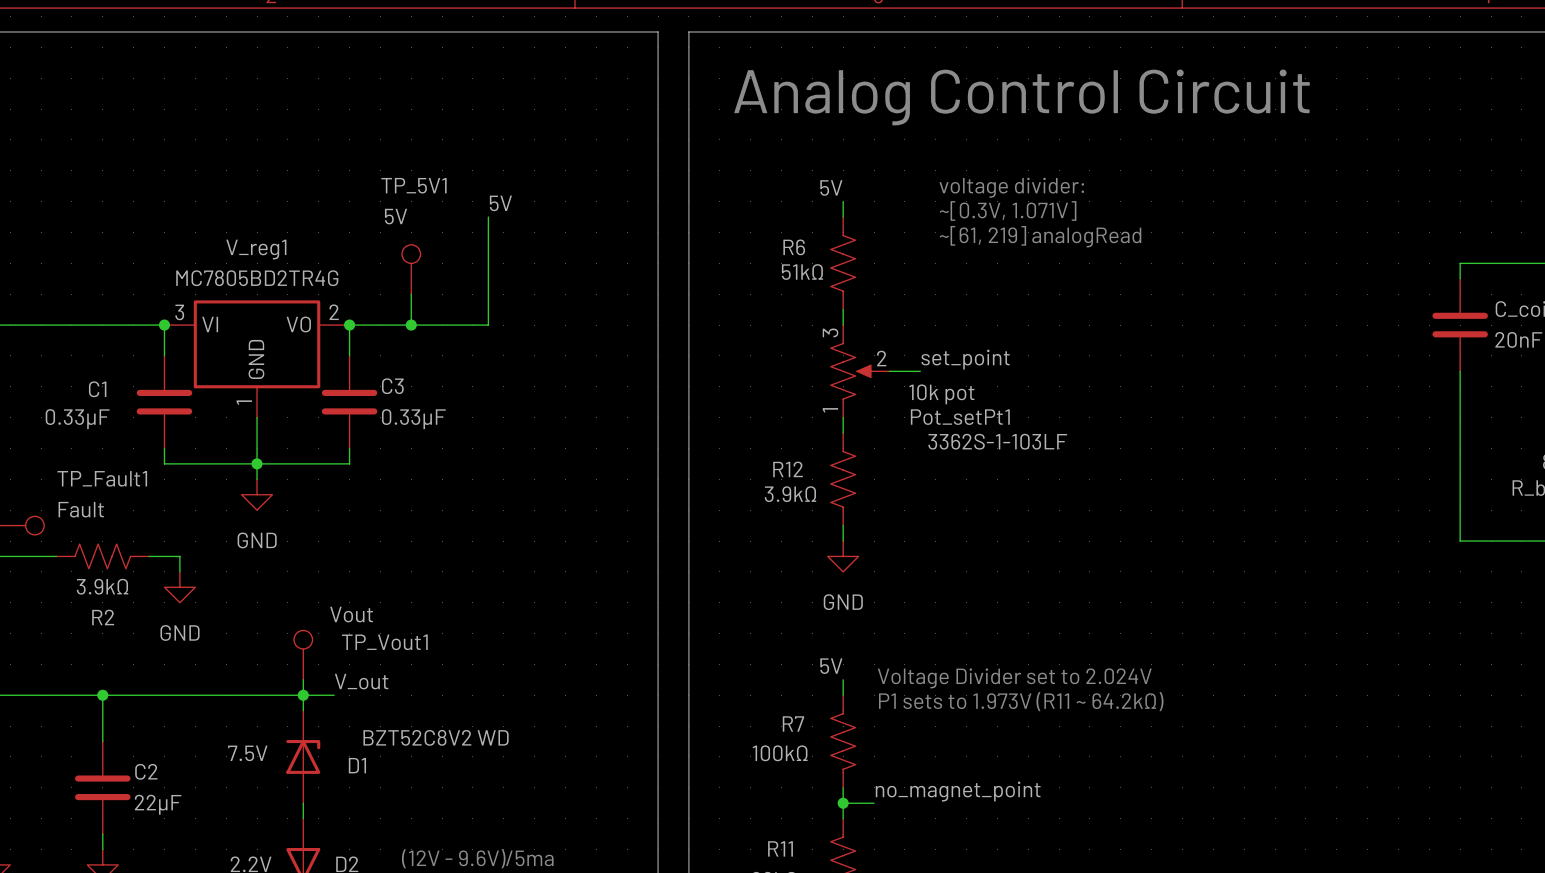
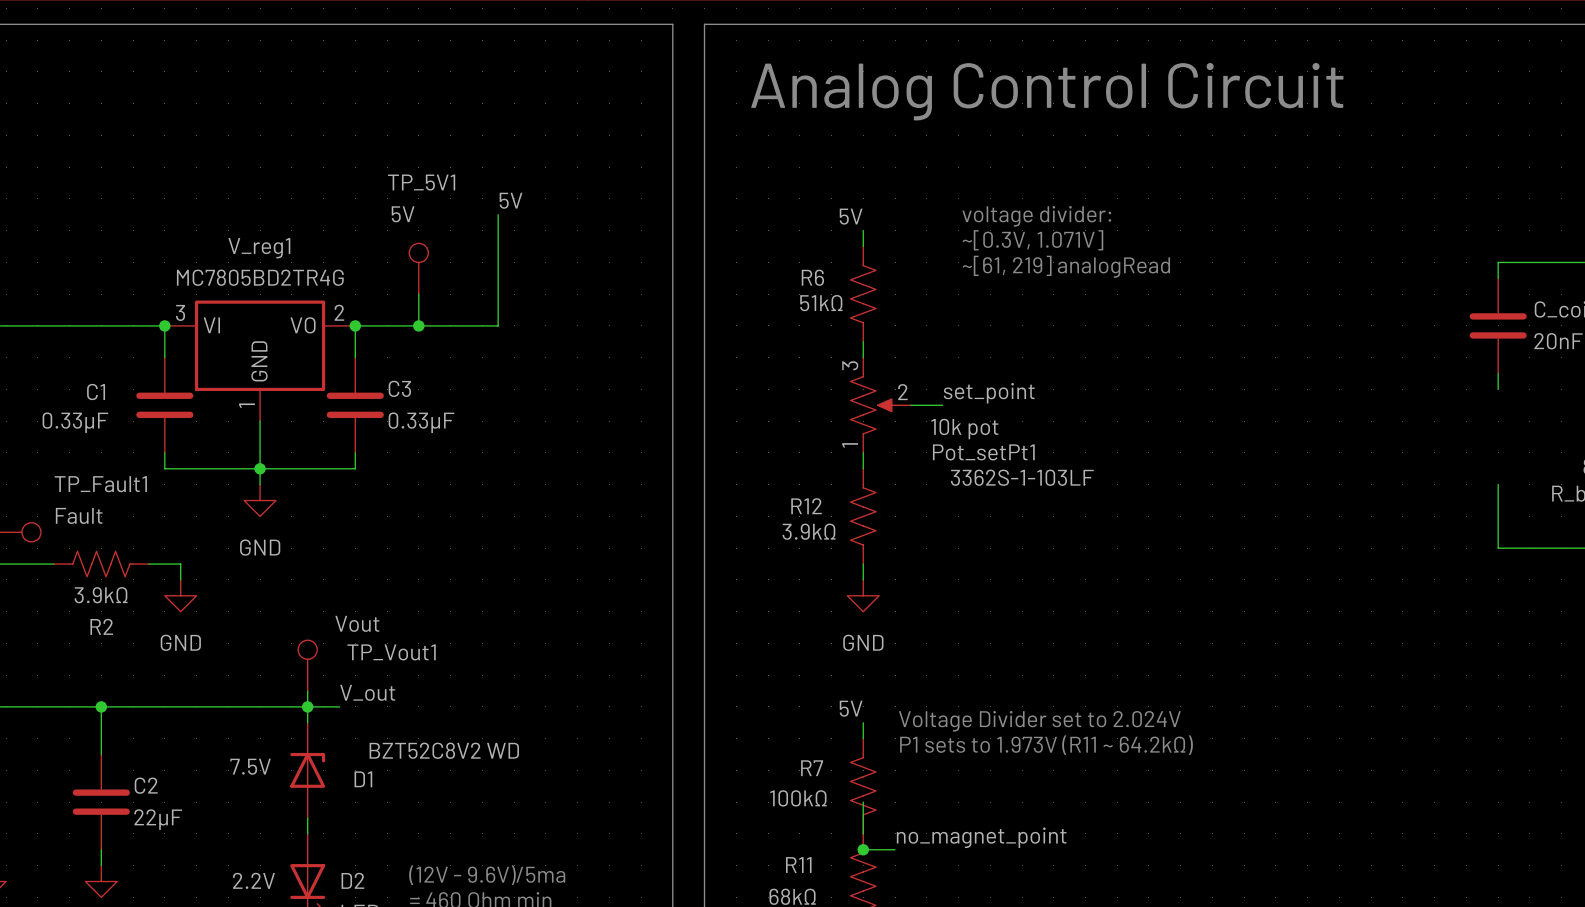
label position: 5V (831, 187) -> 5V (851, 216)
text position: voltage divider: (1011, 187) -> voltage divider: (1036, 216)
wire: (843, 201) (843, 217) -> (863, 230) (863, 246)
text position: ~[0.3V, 1.071V] (1008, 210) -> ~[0.3V, 1.071V] (1032, 240)
text position: ~[61, 219] analogRead (1040, 236) -> ~[61, 219] analogRead (1066, 266)
R6 position: (843, 263) -> (863, 294)
wire: (843, 309) (843, 325) -> (863, 341) (863, 357)
label position: set_point (965, 359) -> set_point (989, 393)
Pot_setPt1 position: (860, 371) -> (880, 405)
wire: (889, 371) (920, 371) -> (910, 405) (942, 405)
wire: (1460, 386) (1460, 479) -> none
wire: (843, 417) (843, 433) -> (863, 452) (863, 468)
R12 position: (843, 479) -> (863, 516)
wire: (843, 525) (843, 541) -> (863, 564) (863, 579)
power symbol position: GND (843, 556) -> GND (863, 595)
label position: 5V (831, 666) -> 5V (851, 708)
text position: Voltage Divider set to 2.024V (1014, 678) -> Voltage Divider set to 2.024V (1039, 721)
wire: (843, 679) (843, 695) -> (863, 722) (863, 738)
text position: P1 sets to 1.973V (R11 ~ 64.2kΩ) (1021, 701) -> P1 sets to 1.973V (R11 ~ 64.2kΩ) (1046, 745)
R7 position: (843, 741) -> (863, 786)
label position: no_magnet_point (958, 791) -> no_magnet_point (981, 837)
wire: (843, 803) (874, 803) -> (863, 849) (895, 849)
junction position: (843, 803) -> (863, 849)

